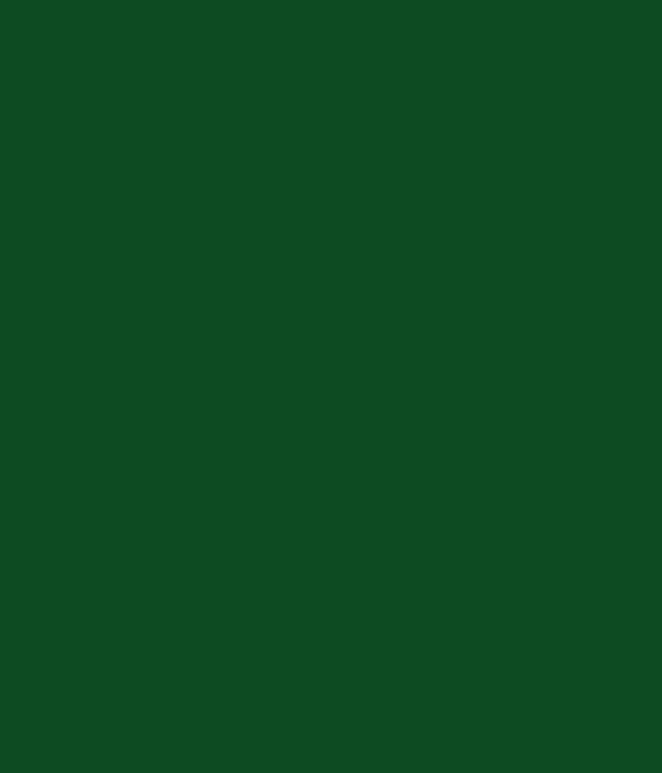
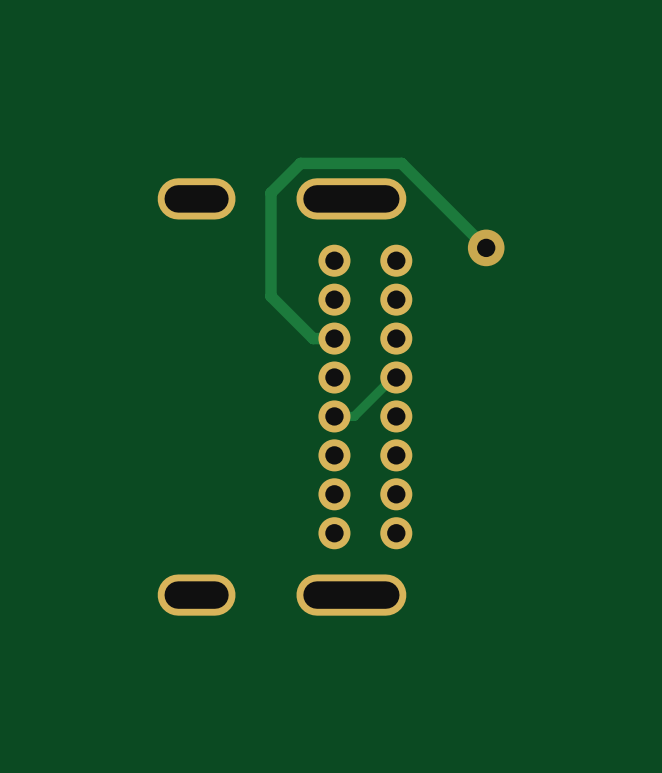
track: none -> (486, 247) (401, 163) (300, 163) (270, 193) (270, 296) (313, 338) (334, 338)
via: none -> (486, 247)
track: none -> (396, 377) (393, 377) (354, 416) (334, 416)
part: none -> (284, 396)

